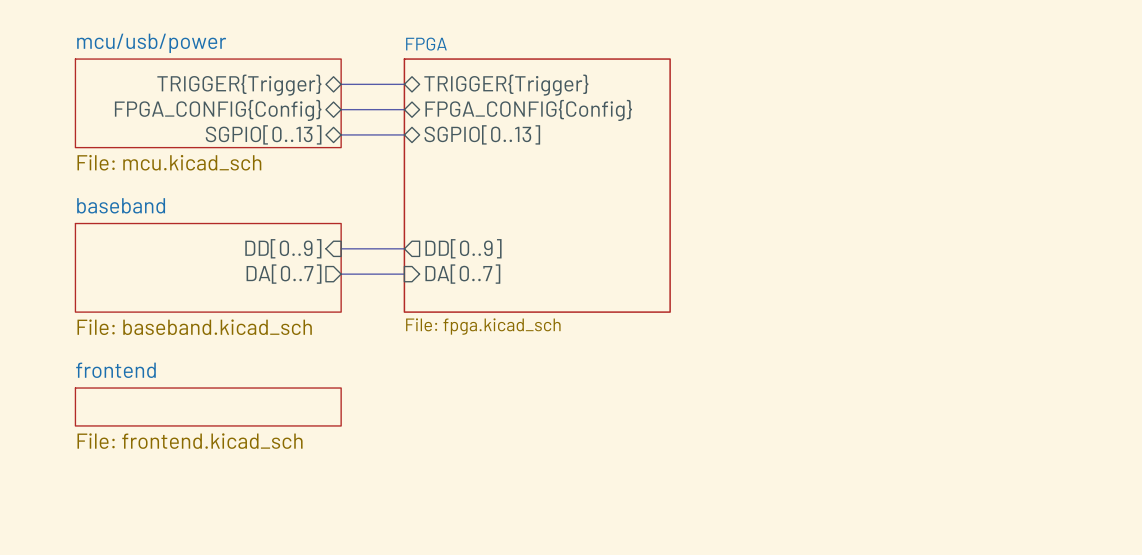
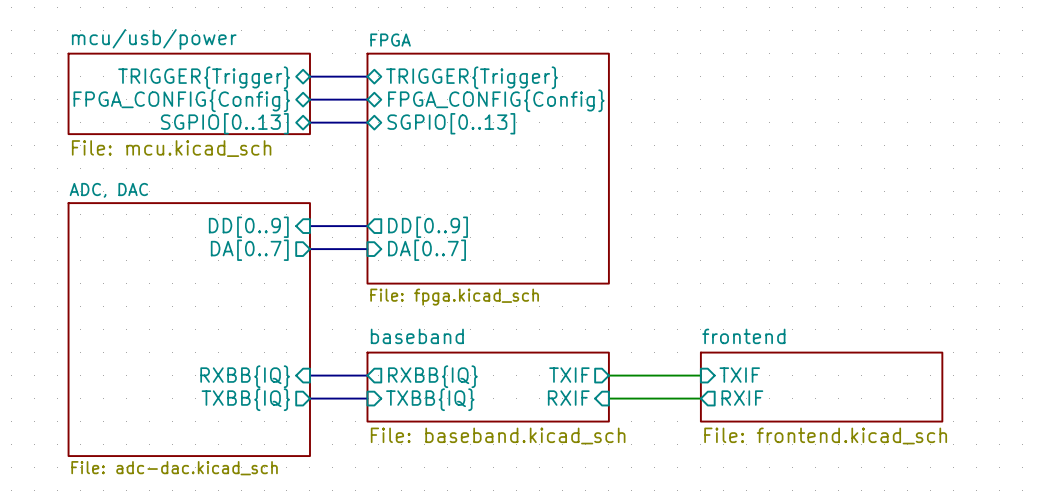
sheet baseband: File: baseband.kicad_sch (208, 267) -> none
sheet ADC, DAC: none -> File: adc-dac.kicad_sch (189, 329)
sheet frontend: File: frontend.kicad_sch (208, 406) -> none
sheet pin: none -> TXIF (569, 375)
sheet pin: none -> TXIF (739, 375)
sheet pin: none -> RXBB{IQ} (245, 376)
bus: none -> (309, 375) (367, 375)
sheet pin: none -> RXBB{IQ} (432, 376)
wire: none -> (608, 375) (700, 375)
sheet baseband: none -> File: baseband.kicad_sch (488, 387)
sheet frontend: none -> File: frontend.kicad_sch (821, 387)
sheet pin: none -> TXBB{IQ} (245, 399)
bus: none -> (309, 398) (367, 398)
sheet pin: none -> TXBB{IQ} (430, 399)
sheet pin: none -> RXIF (568, 398)
wire: none -> (608, 398) (700, 398)
sheet pin: none -> RXIF (742, 398)

